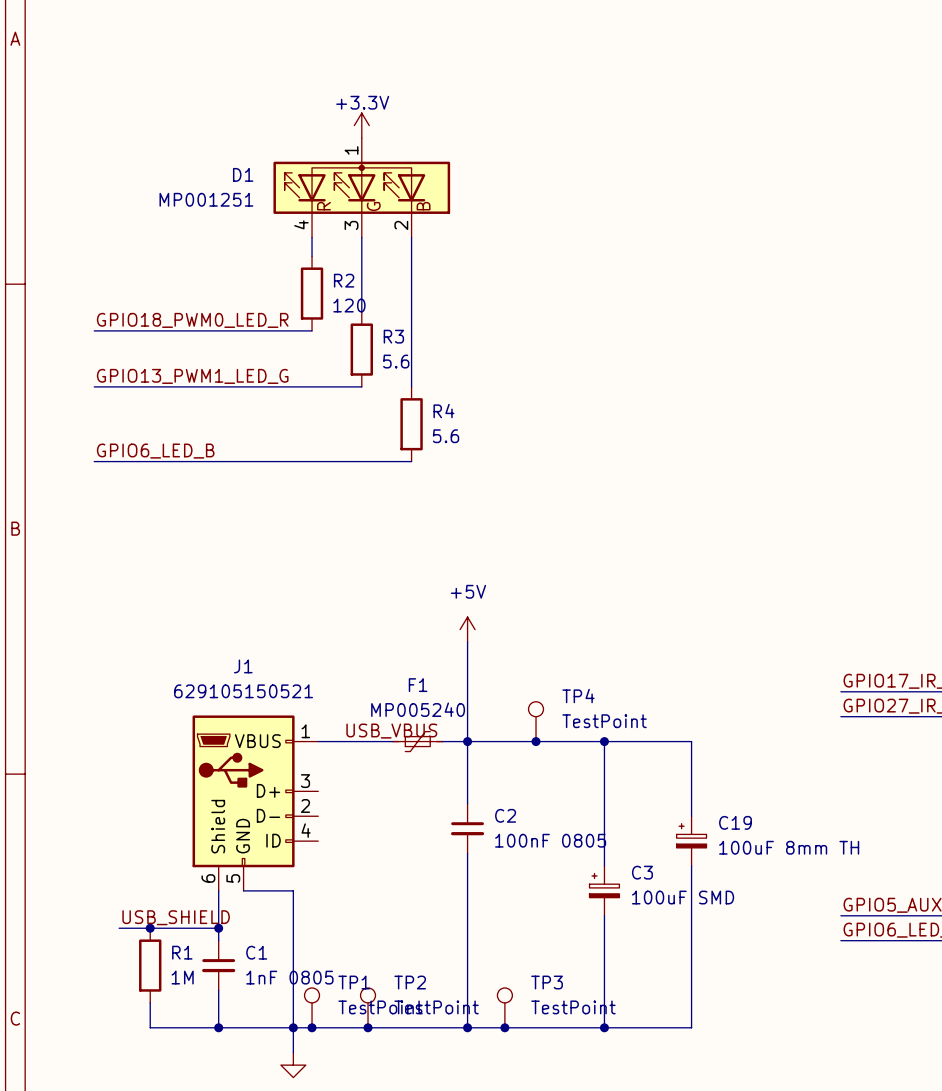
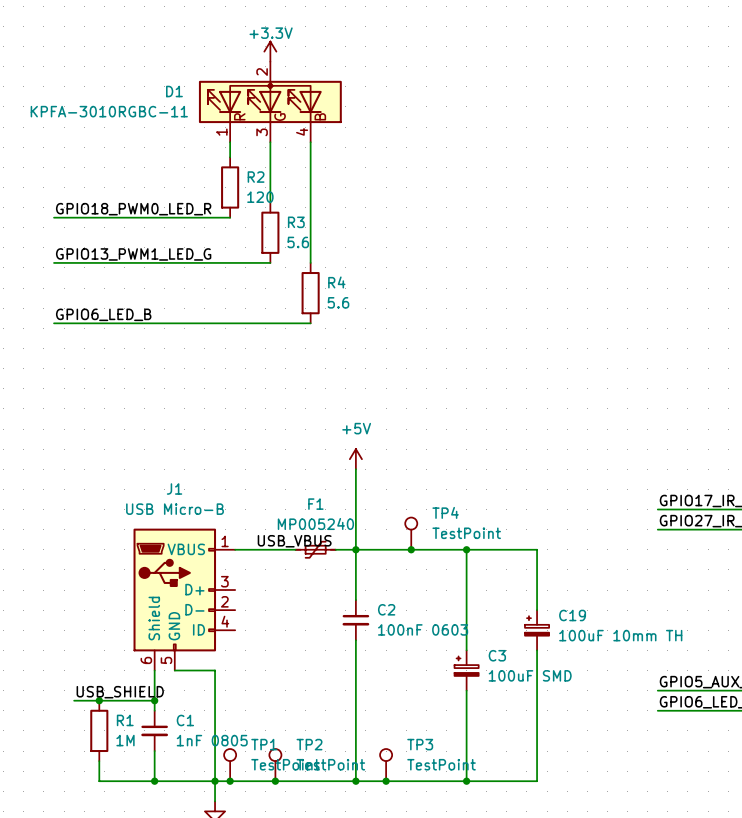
D1 pin number: 1 (351, 150) -> 2 (262, 72)
D1 value: MP001251 (206, 199) -> KPFA-3010RGBC-11 (109, 111)
D1 pin number: 4 (301, 224) -> 1 (221, 132)
D1 pin number: 2 (401, 225) -> 4 (302, 131)
J1 value: 629105150521 (243, 691) -> USB Micro-B (175, 509)
C2 value: 100nF 0805 (550, 840) -> 100nF 0603 (423, 629)
C19 value: 100uF 8mm TH (789, 847) -> 100uF 10mm TH (620, 635)

